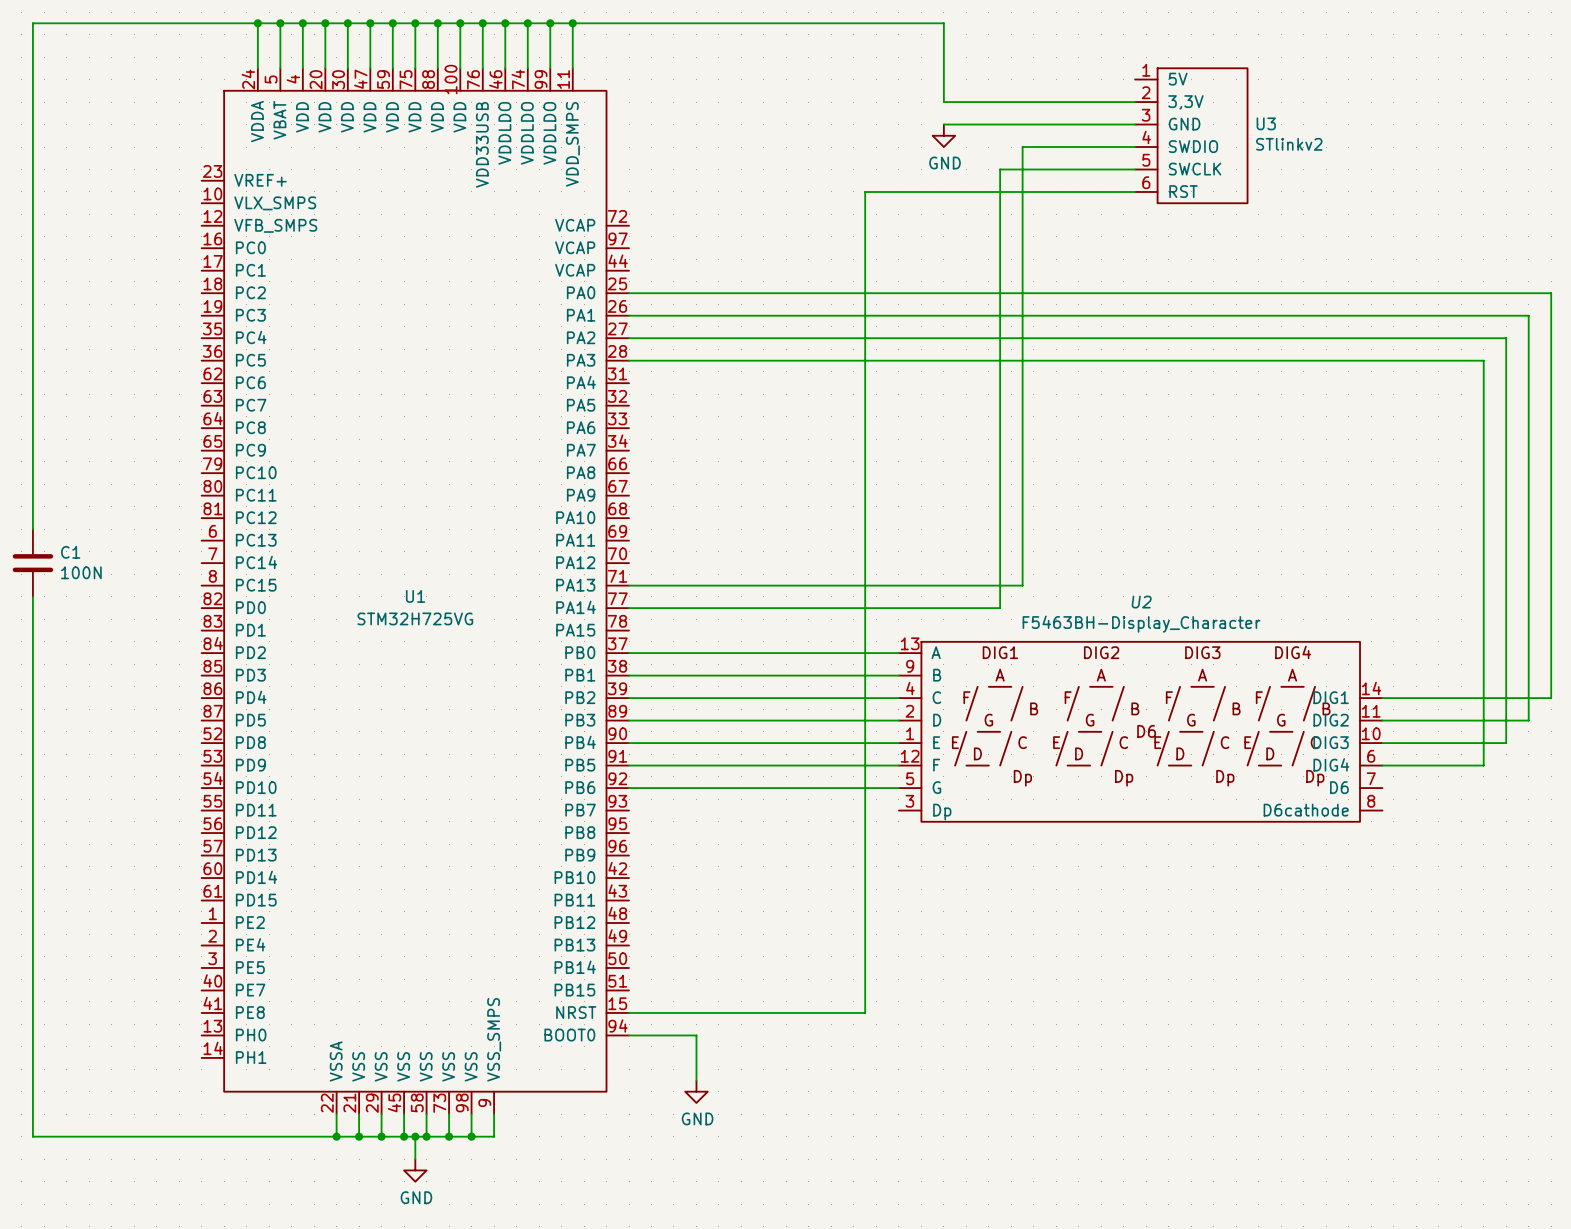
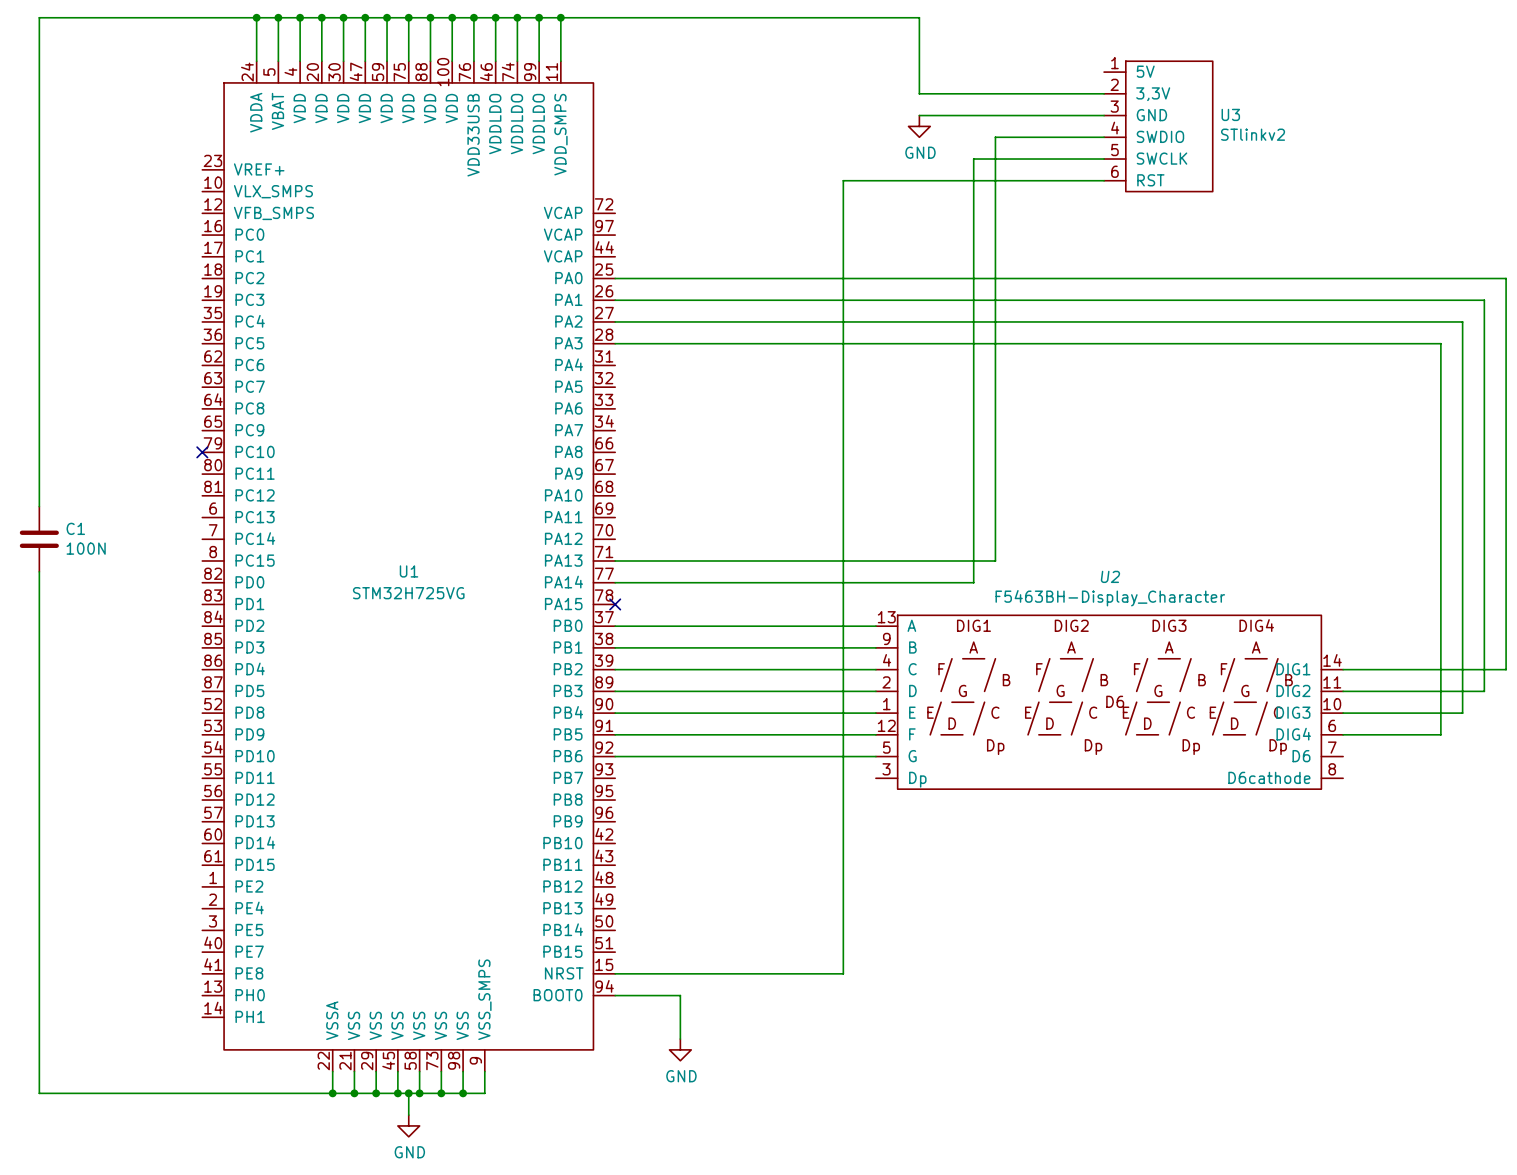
no-connect mark: none -> (202, 452)
no-connect mark: none -> (615, 604)

